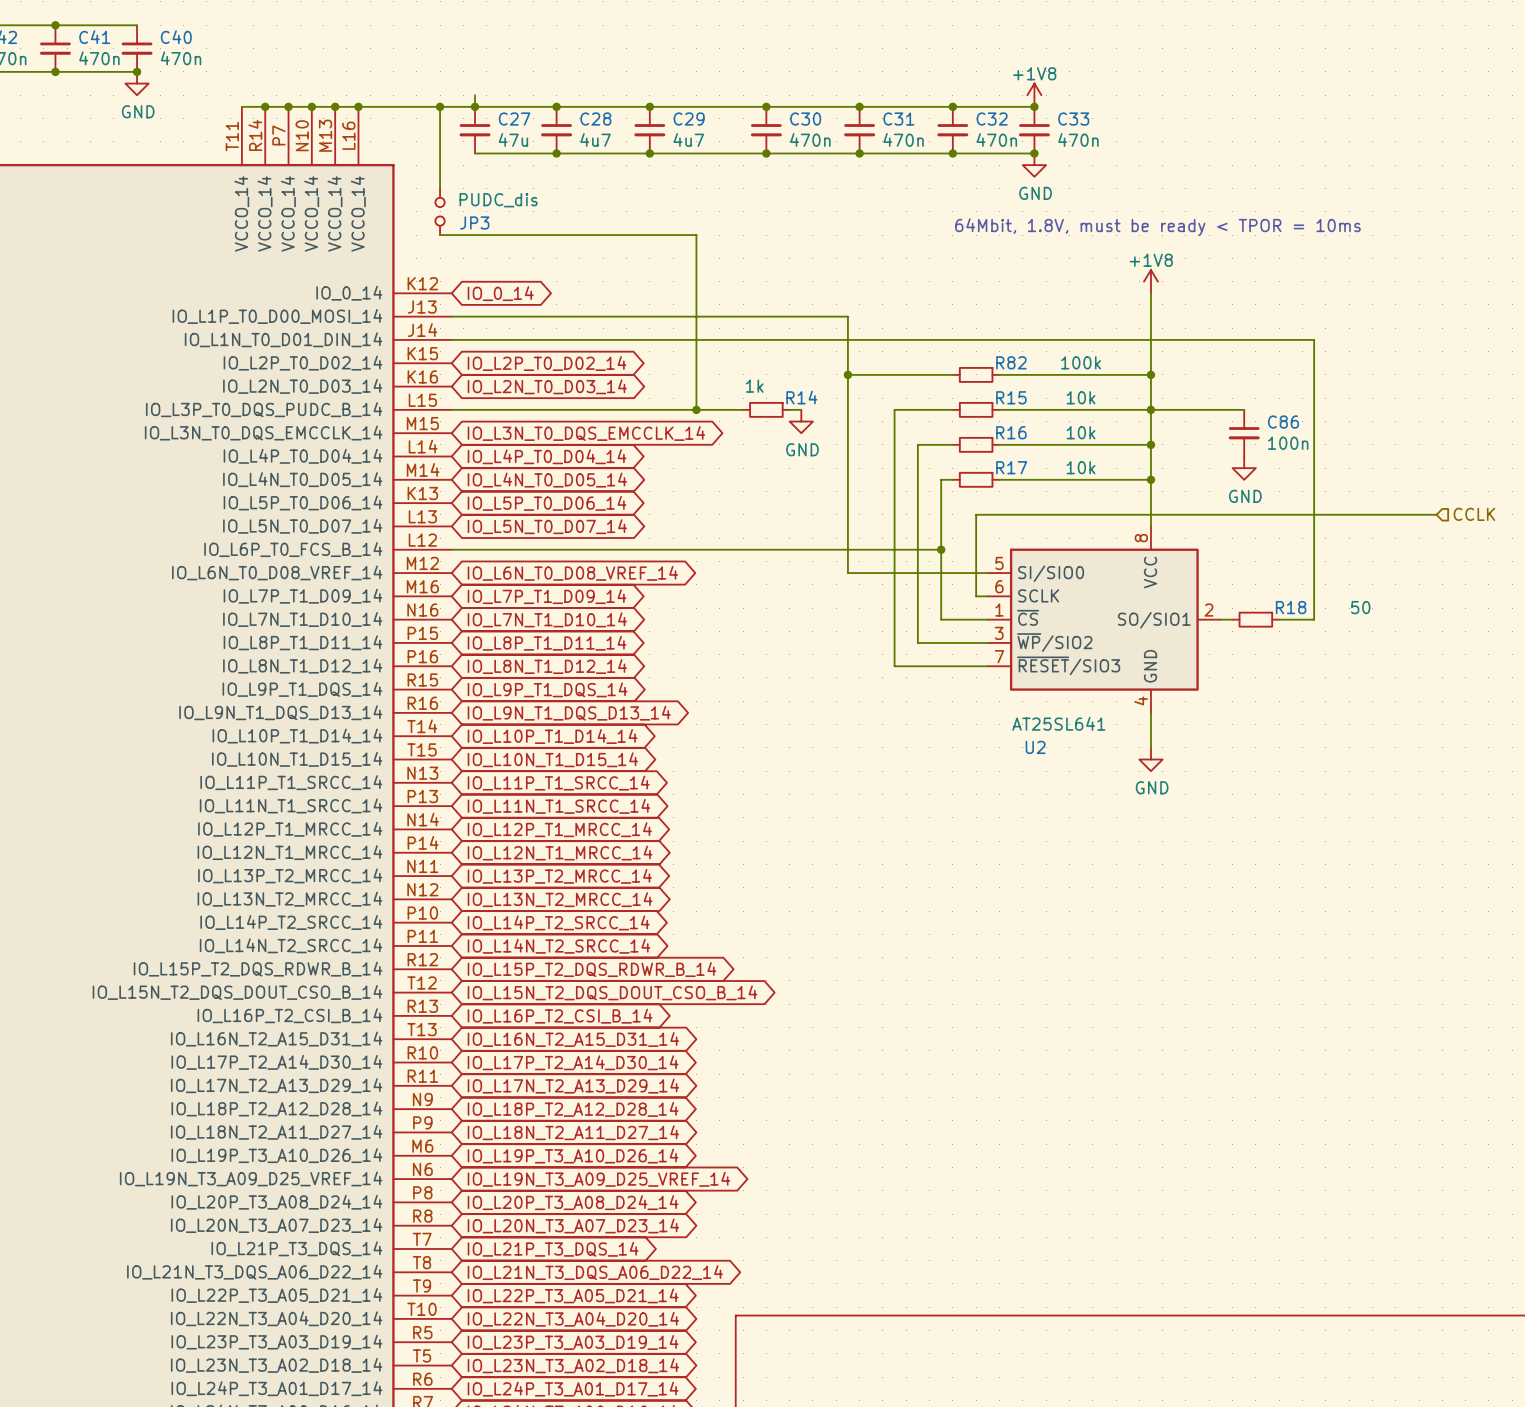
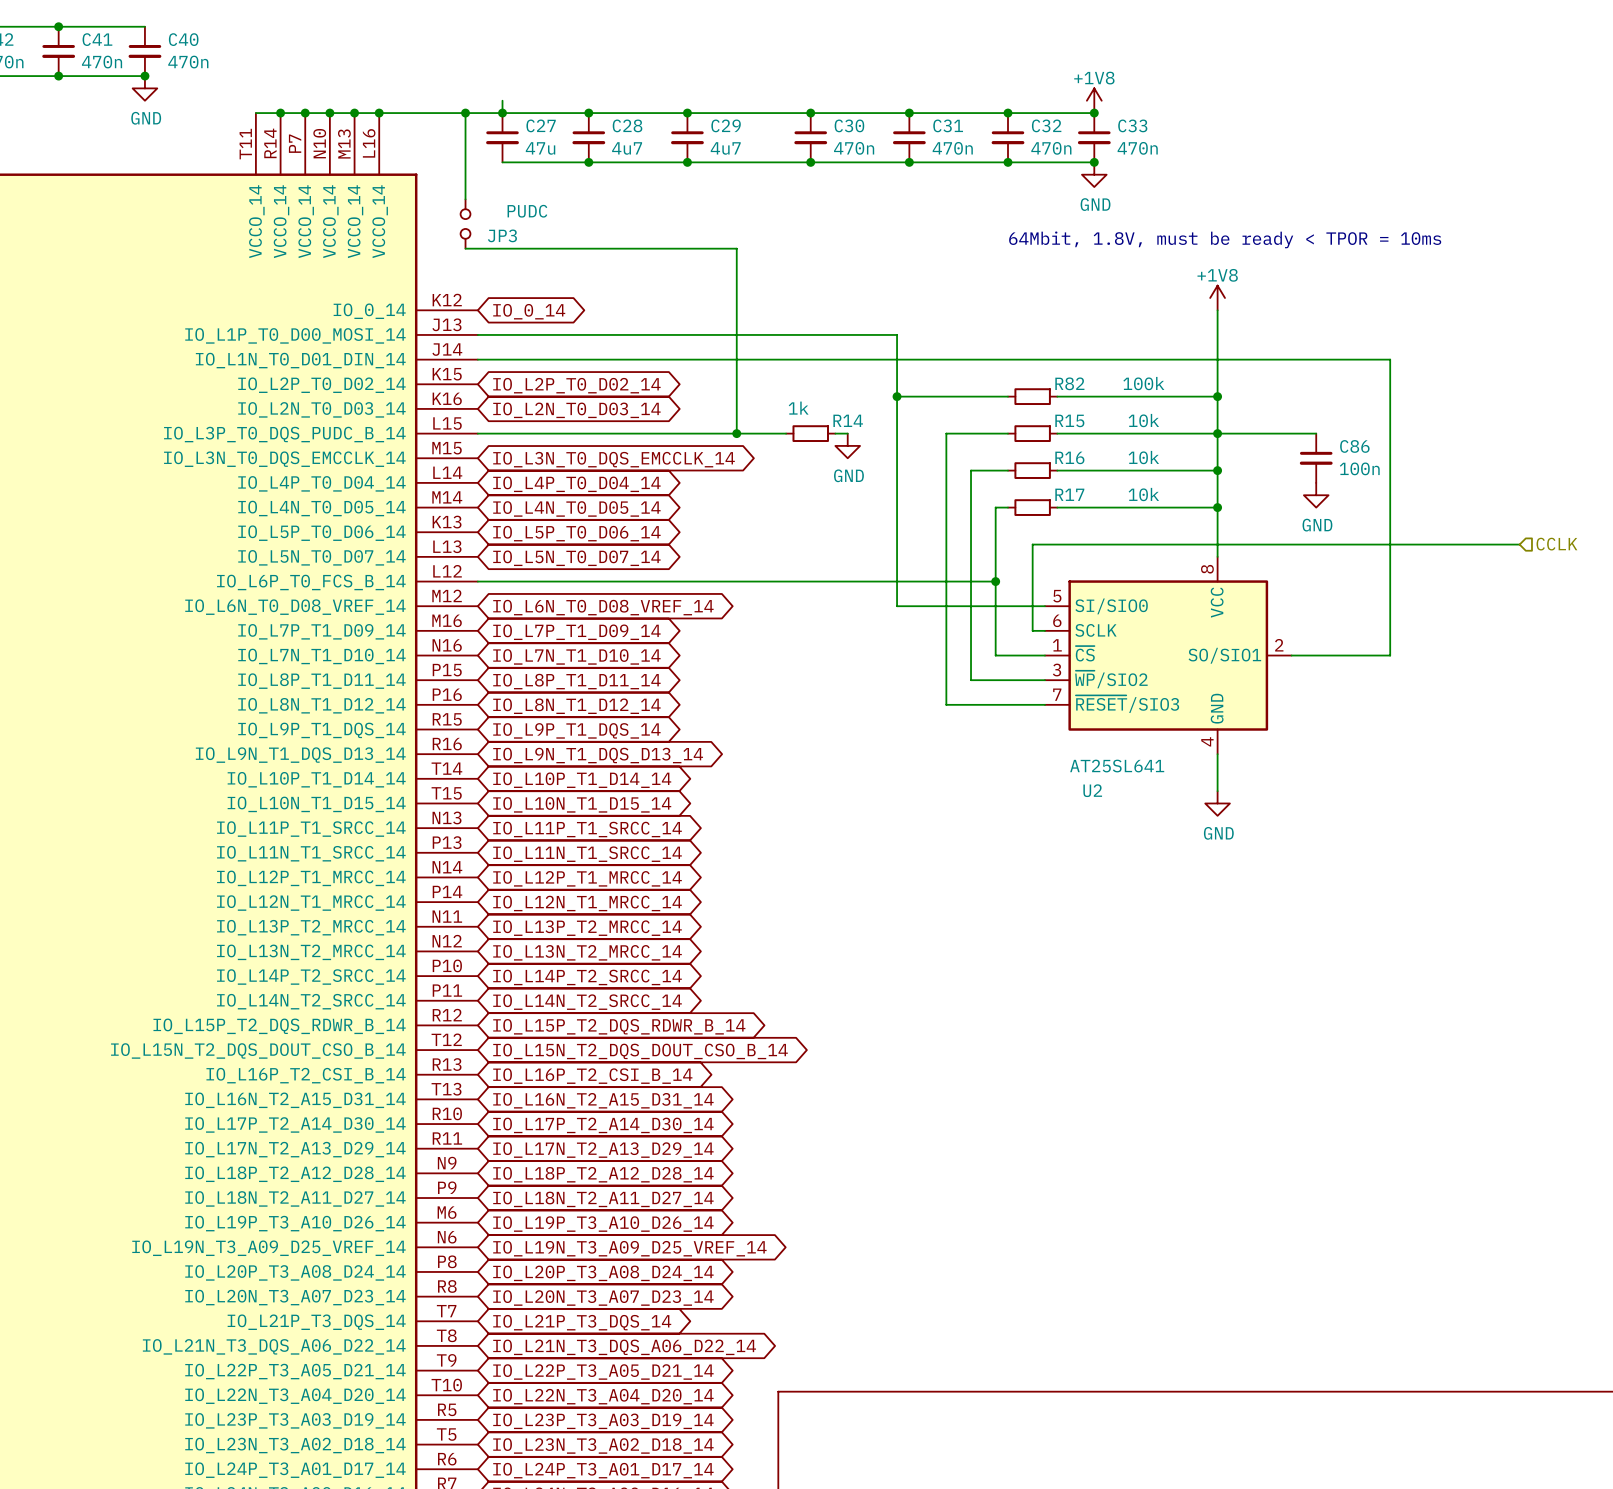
JP3 value: PUDC_dis (498, 200) -> PUDC (527, 211)
wire: none -> (1303, 655) (1353, 655)
R18: 50 (1255, 619) -> none

